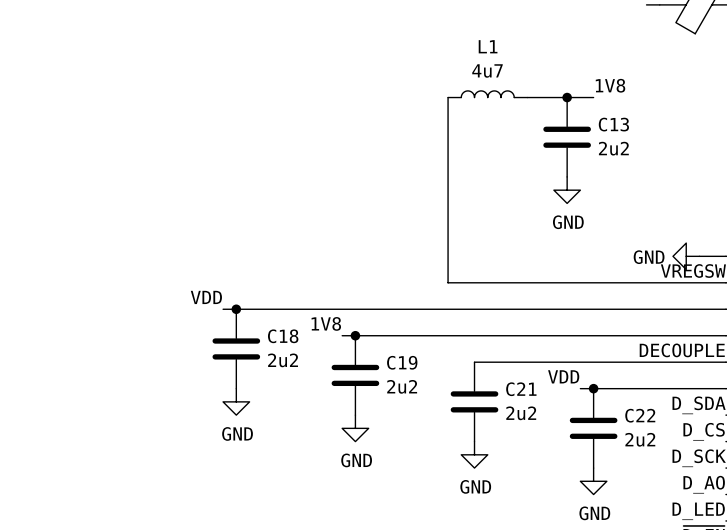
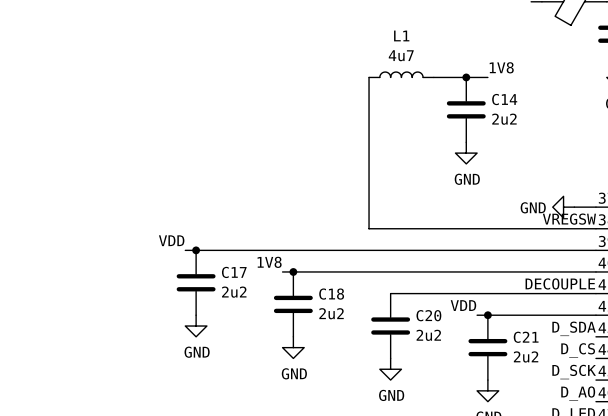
C13 name: C13 (613, 124) -> C14 (504, 99)
C18 name: C18 (283, 336) -> C17 (234, 272)
C19 name: C19 (402, 362) -> C18 (331, 294)
C21 name: C21 (521, 389) -> C20 (428, 315)
C22 name: C22 (640, 415) -> C21 (526, 337)

